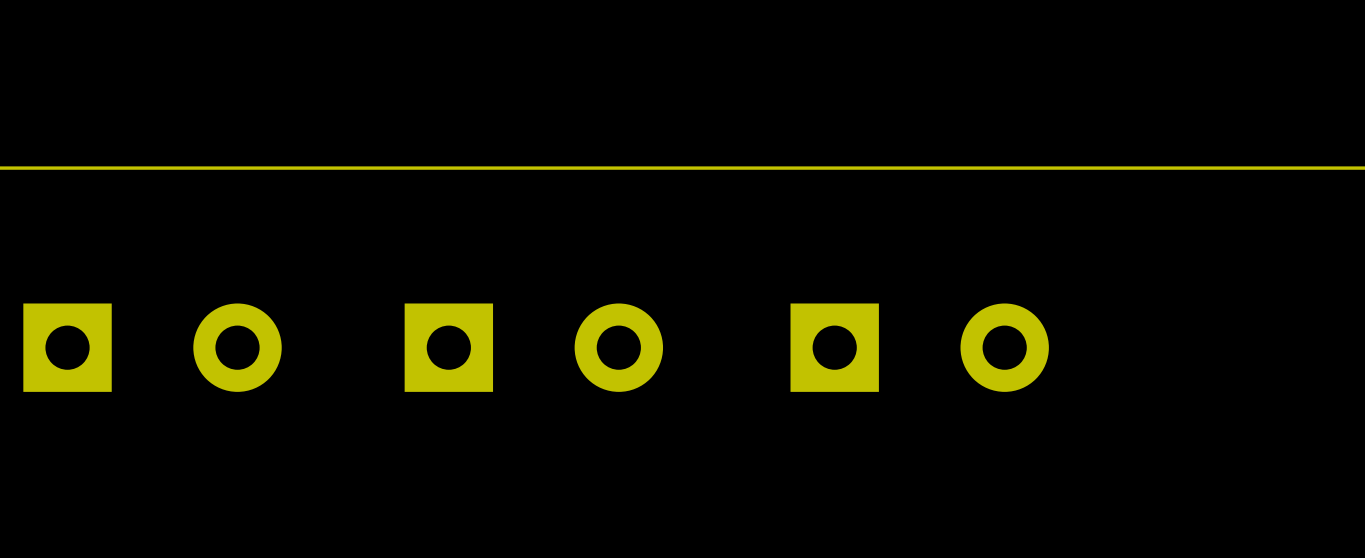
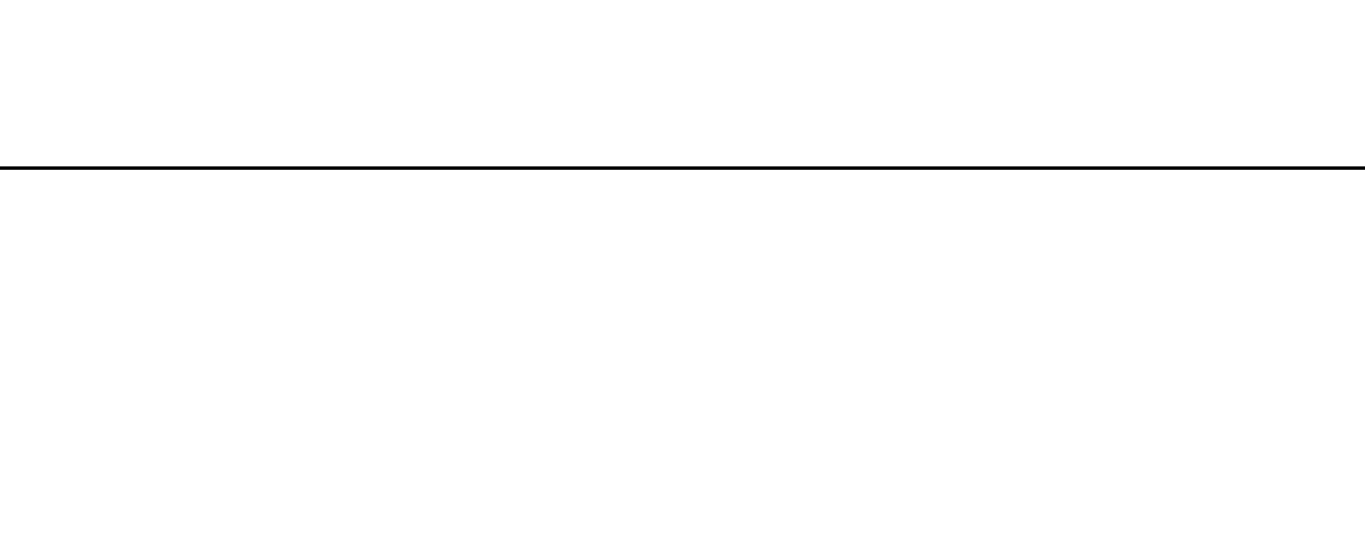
part: (152, 347) -> none
part: (533, 347) -> none
part: (919, 347) -> none

